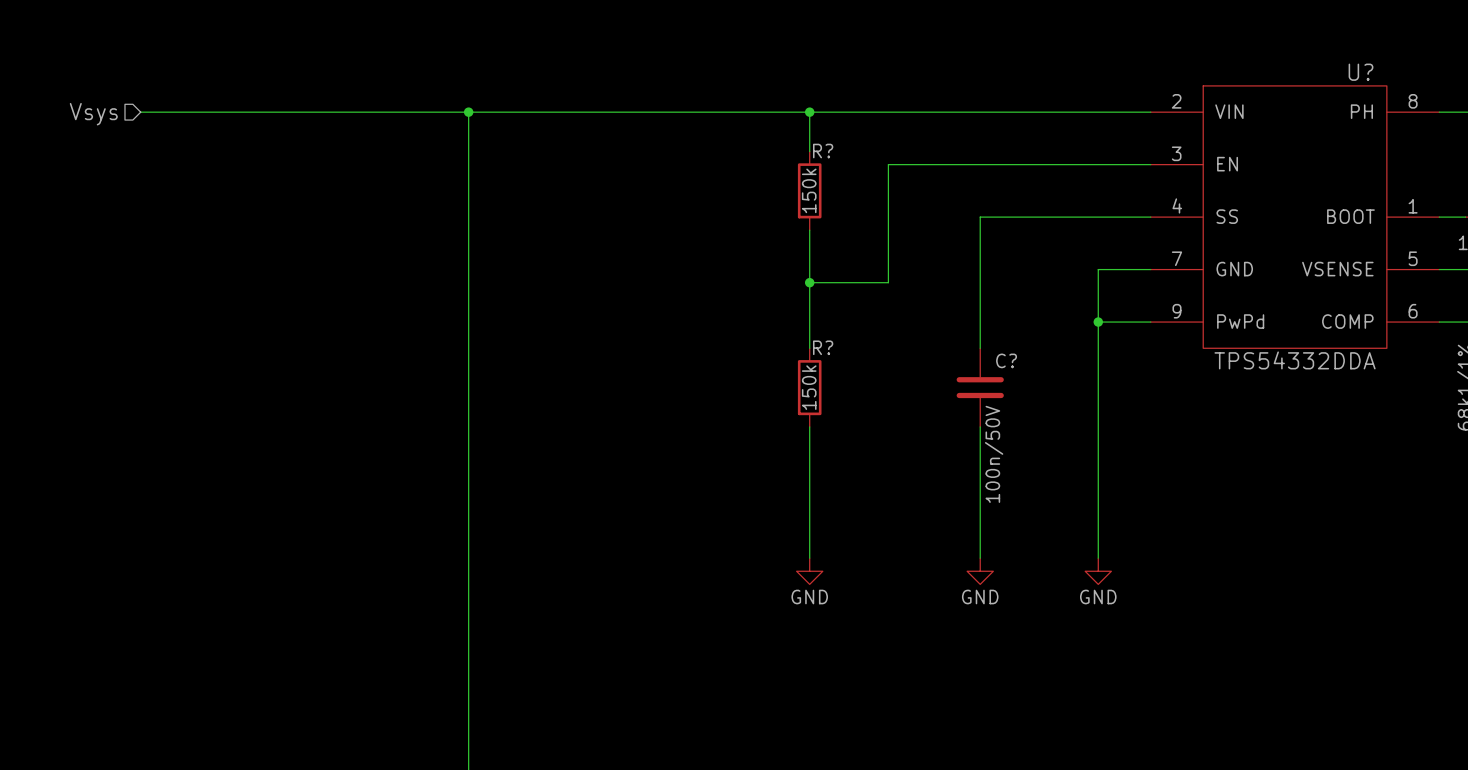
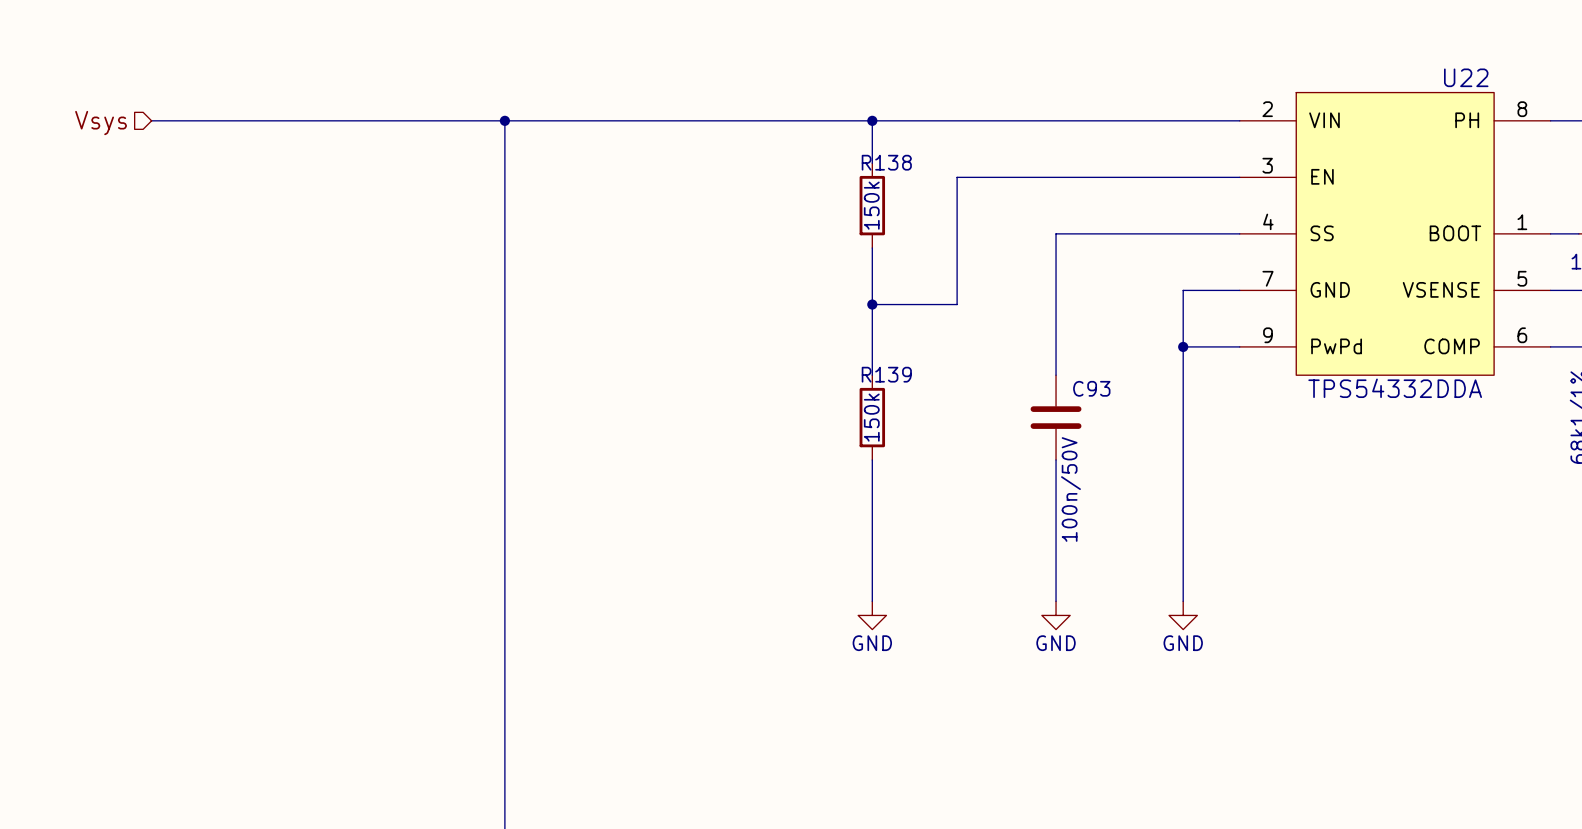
U? name: U? (1361, 72) -> U22 (1466, 77)
R? name: R? (823, 151) -> R138 (886, 162)
R? name: R? (823, 347) -> R139 (886, 374)
C? name: C? (1006, 360) -> C93 (1091, 388)

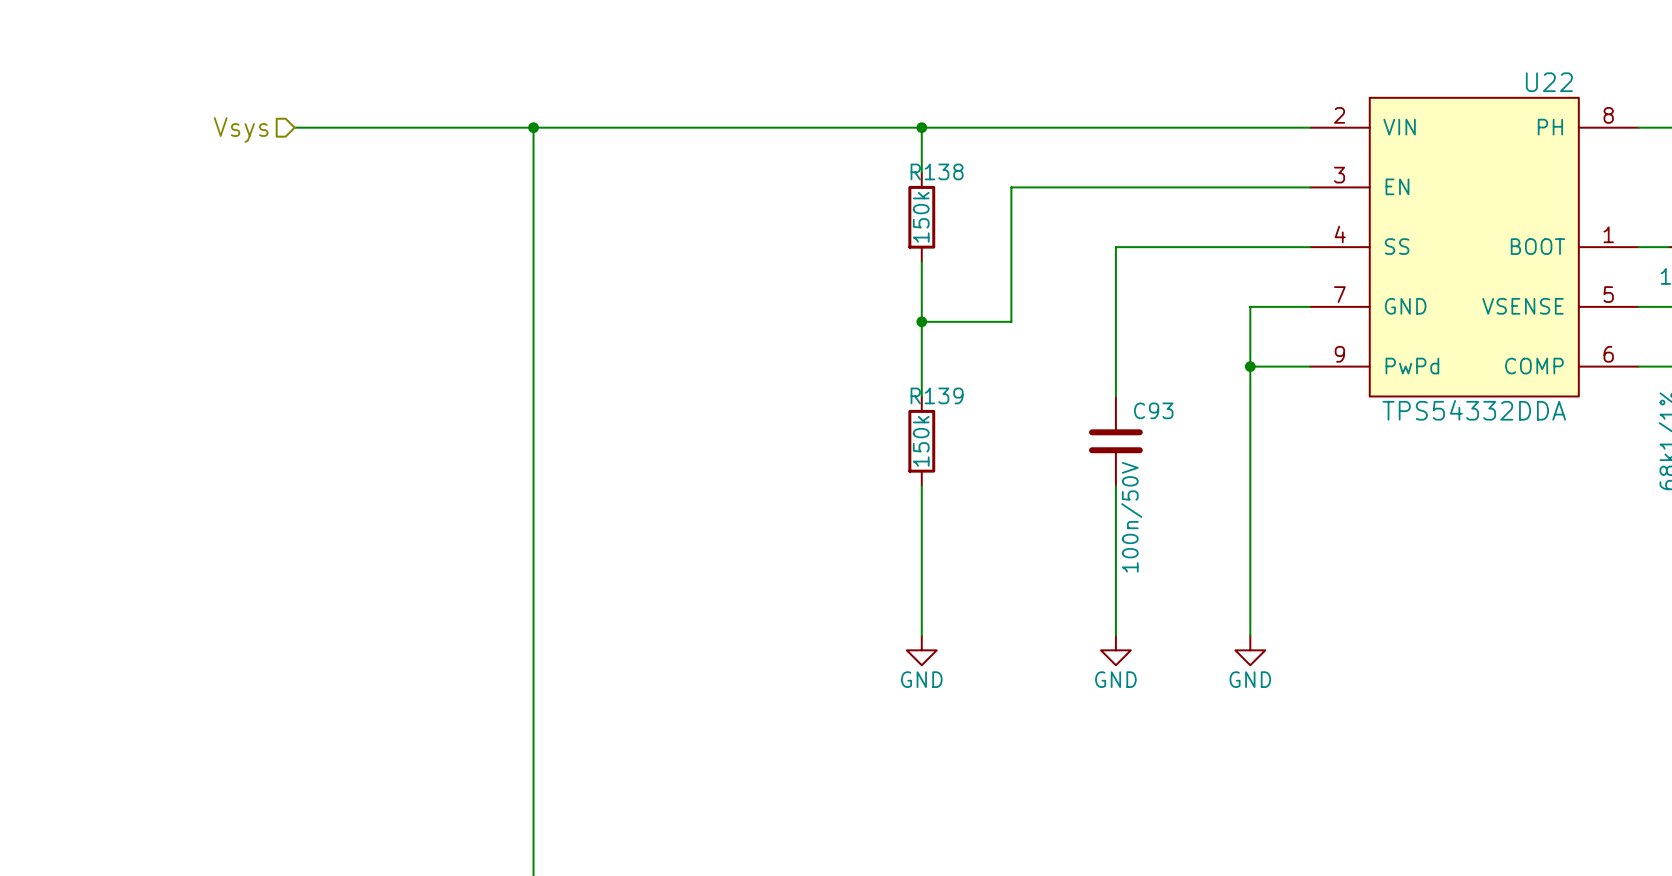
wire: (151, 120) (278, 120) -> none
hierarchical label position: Vsys (101, 123) -> Vsys (241, 130)

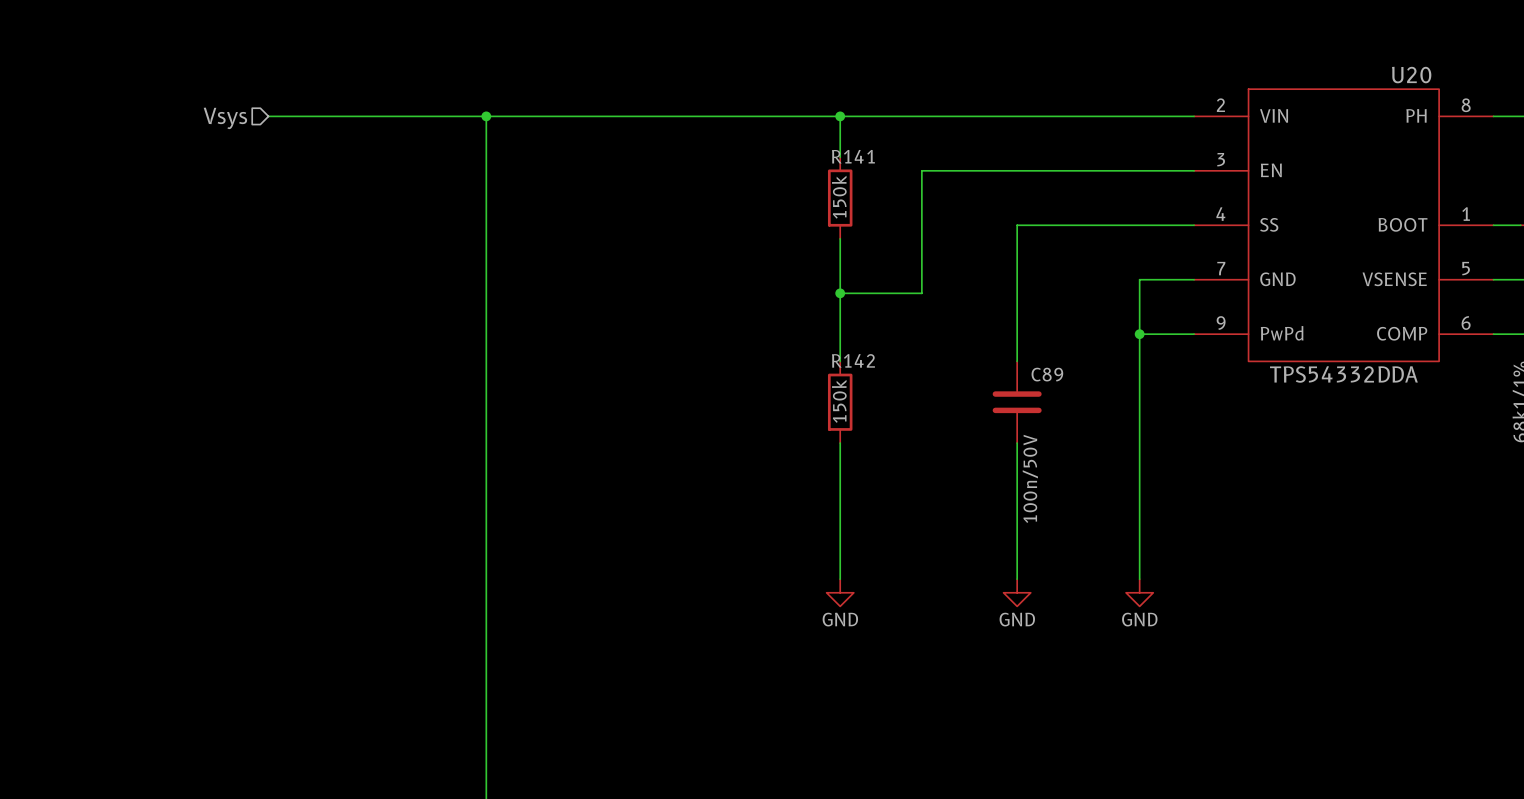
U22 name: U22 (1549, 82) -> U20 (1411, 75)
R138 name: R138 (937, 171) -> R141 (853, 156)
R139 name: R139 (937, 395) -> R142 (853, 360)
C93 name: C93 (1153, 410) -> C89 (1047, 374)

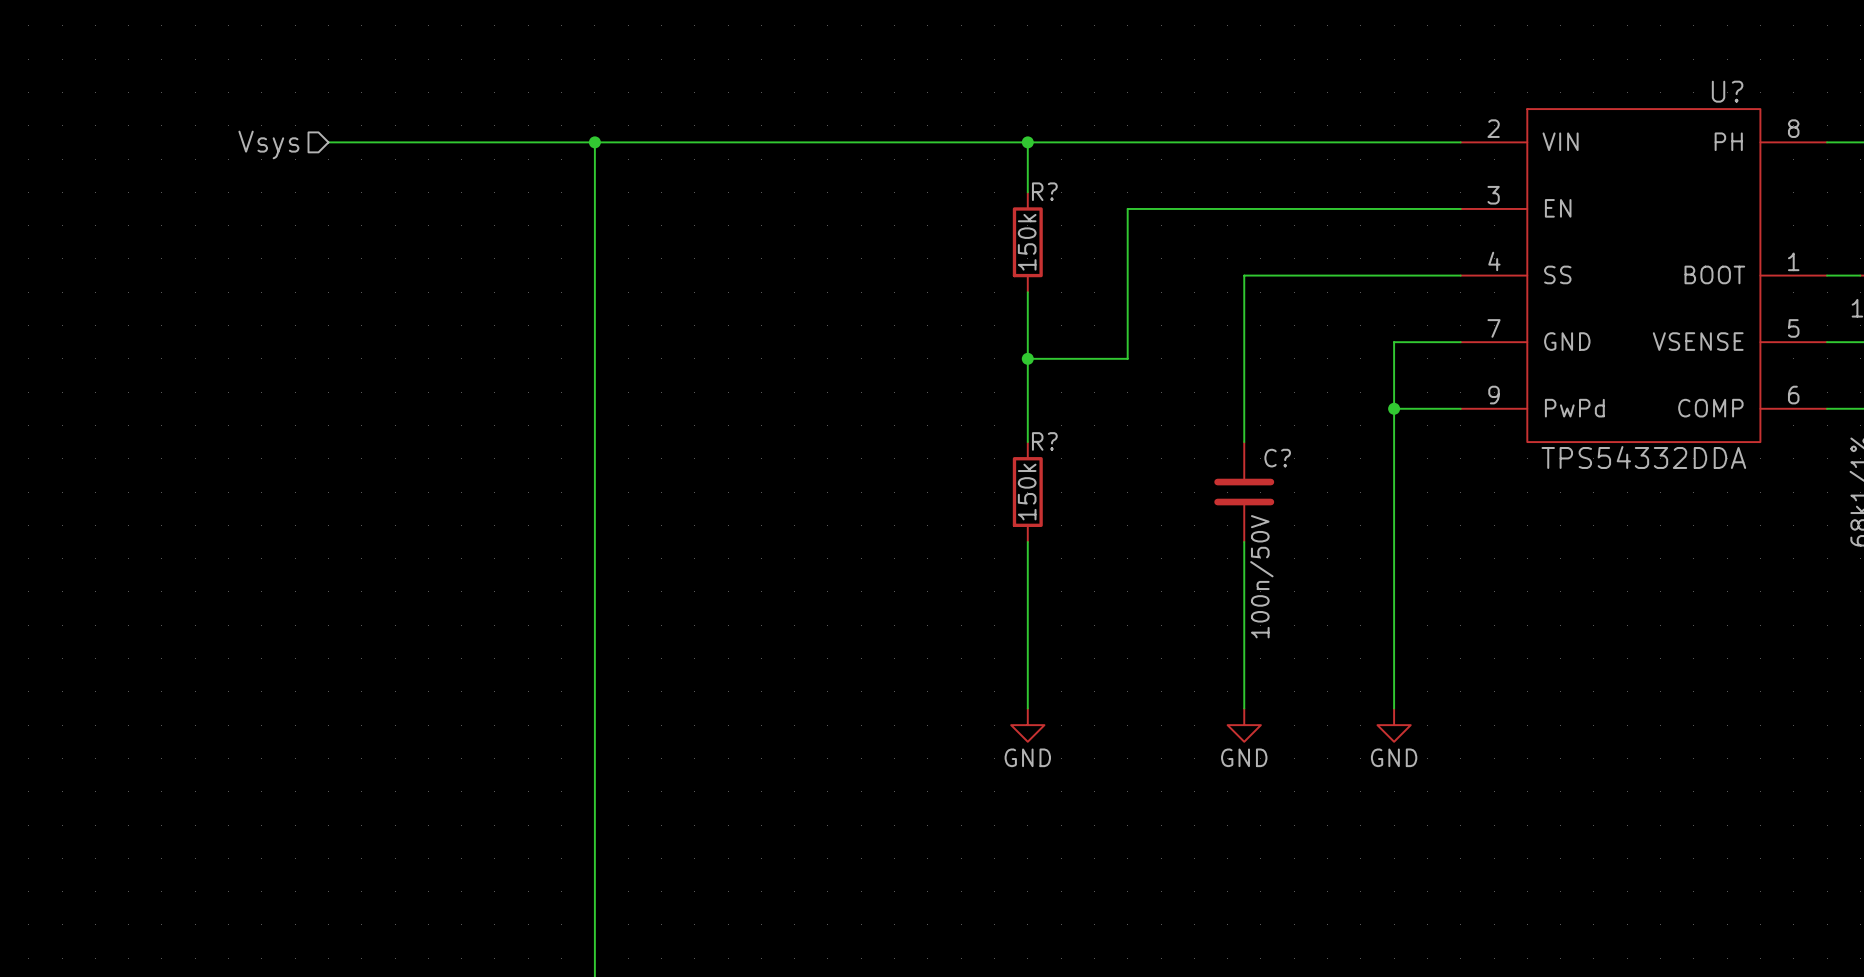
U20 name: U20 (1411, 75) -> U? (1727, 91)
R141 name: R141 (853, 156) -> R? (1044, 191)
R142 name: R142 (853, 360) -> R? (1044, 441)
C89 name: C89 (1047, 374) -> C? (1277, 458)

